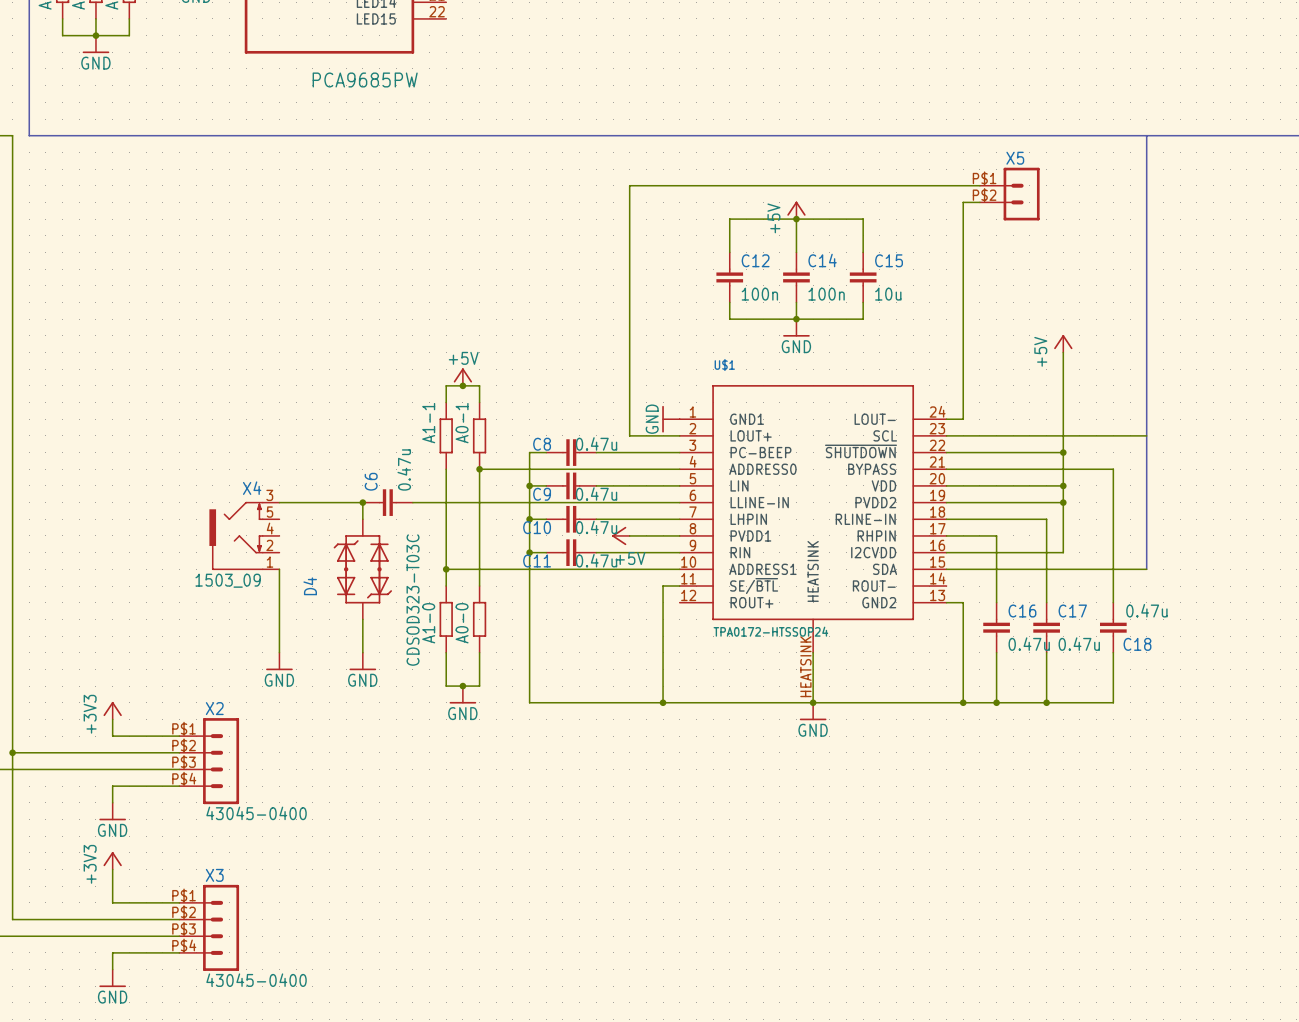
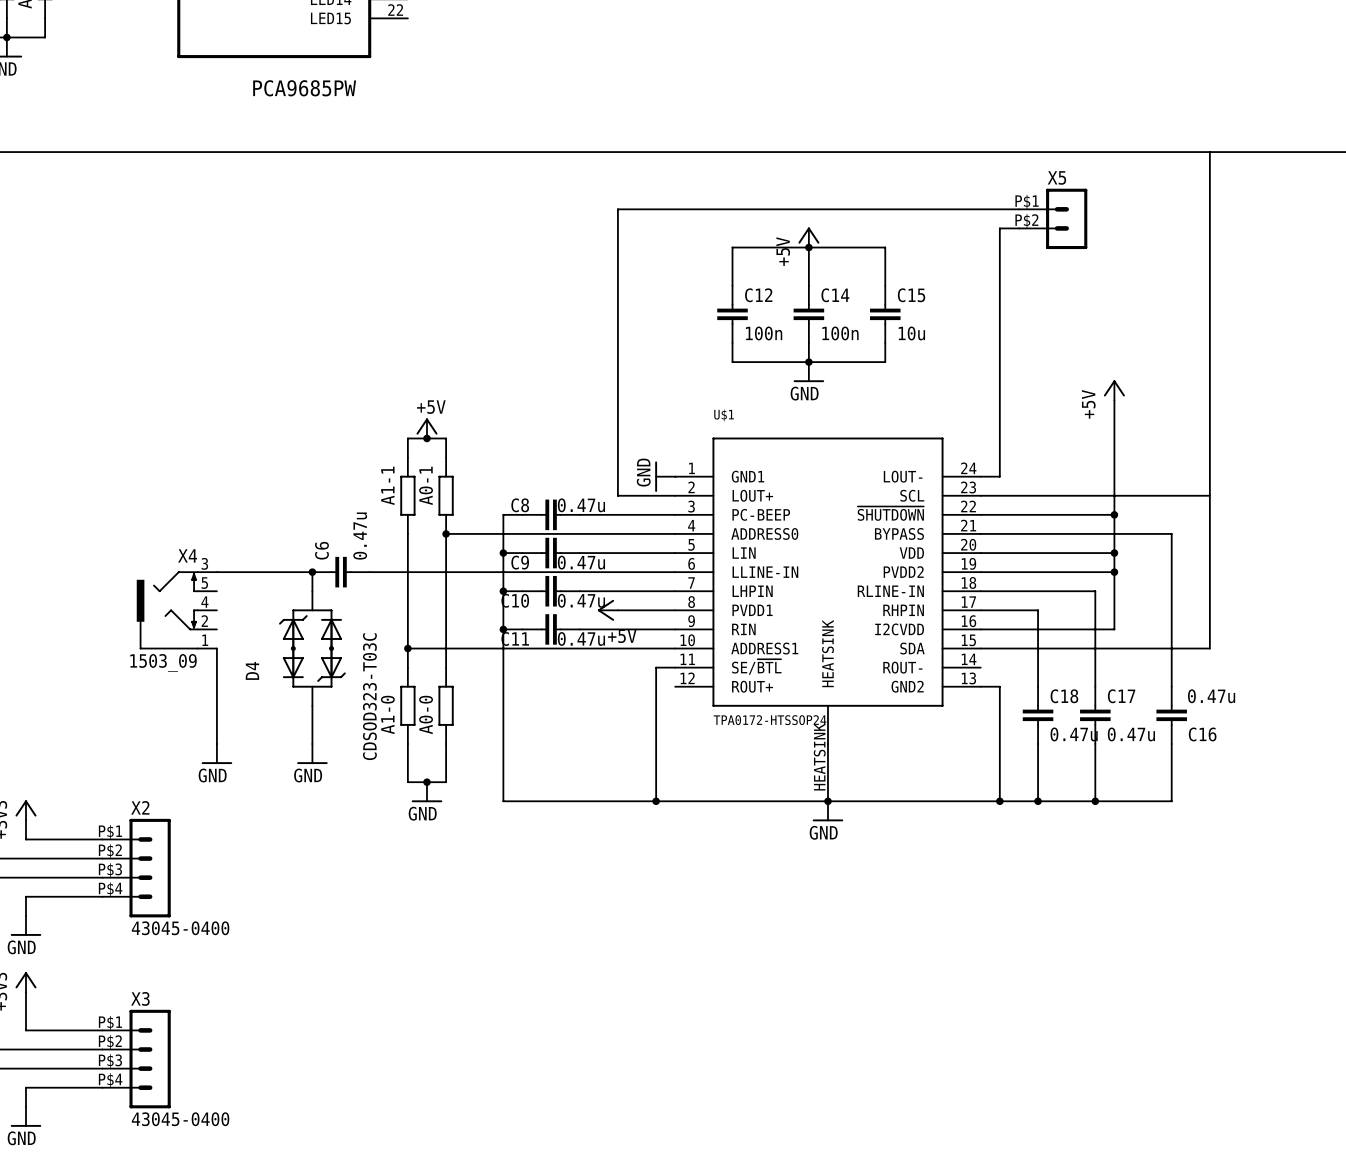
C16 name: C16 (1022, 611) -> C18 (1064, 696)
C18 name: C18 (1137, 644) -> C16 (1202, 734)

